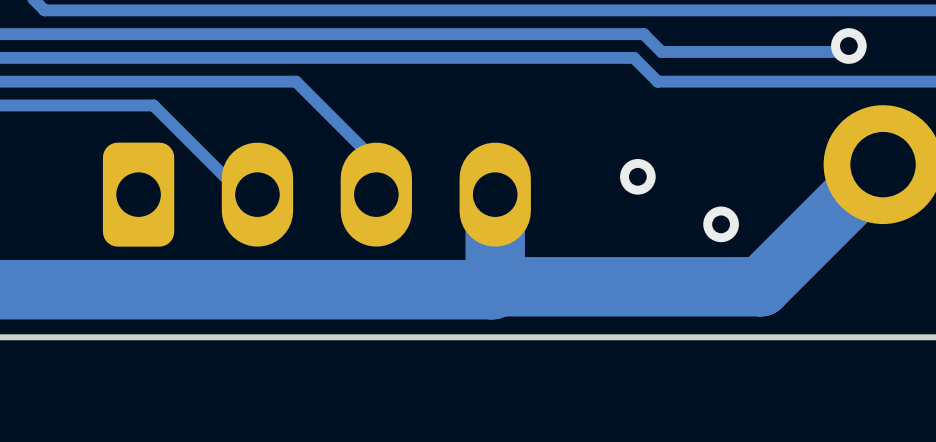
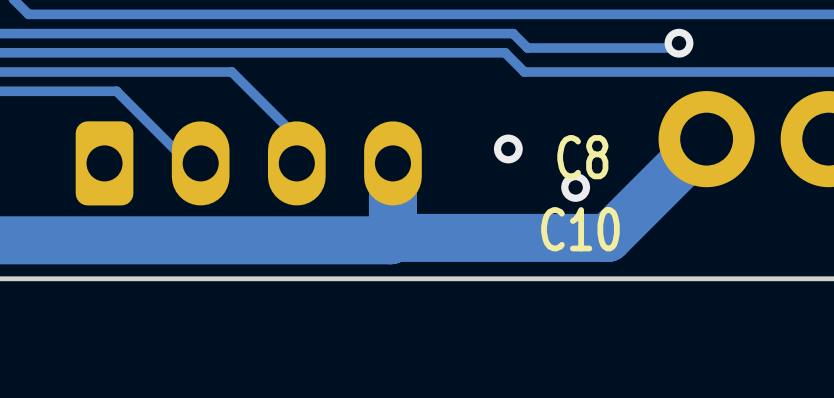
C8: none -> (582, 157)
C10: none -> (580, 229)

